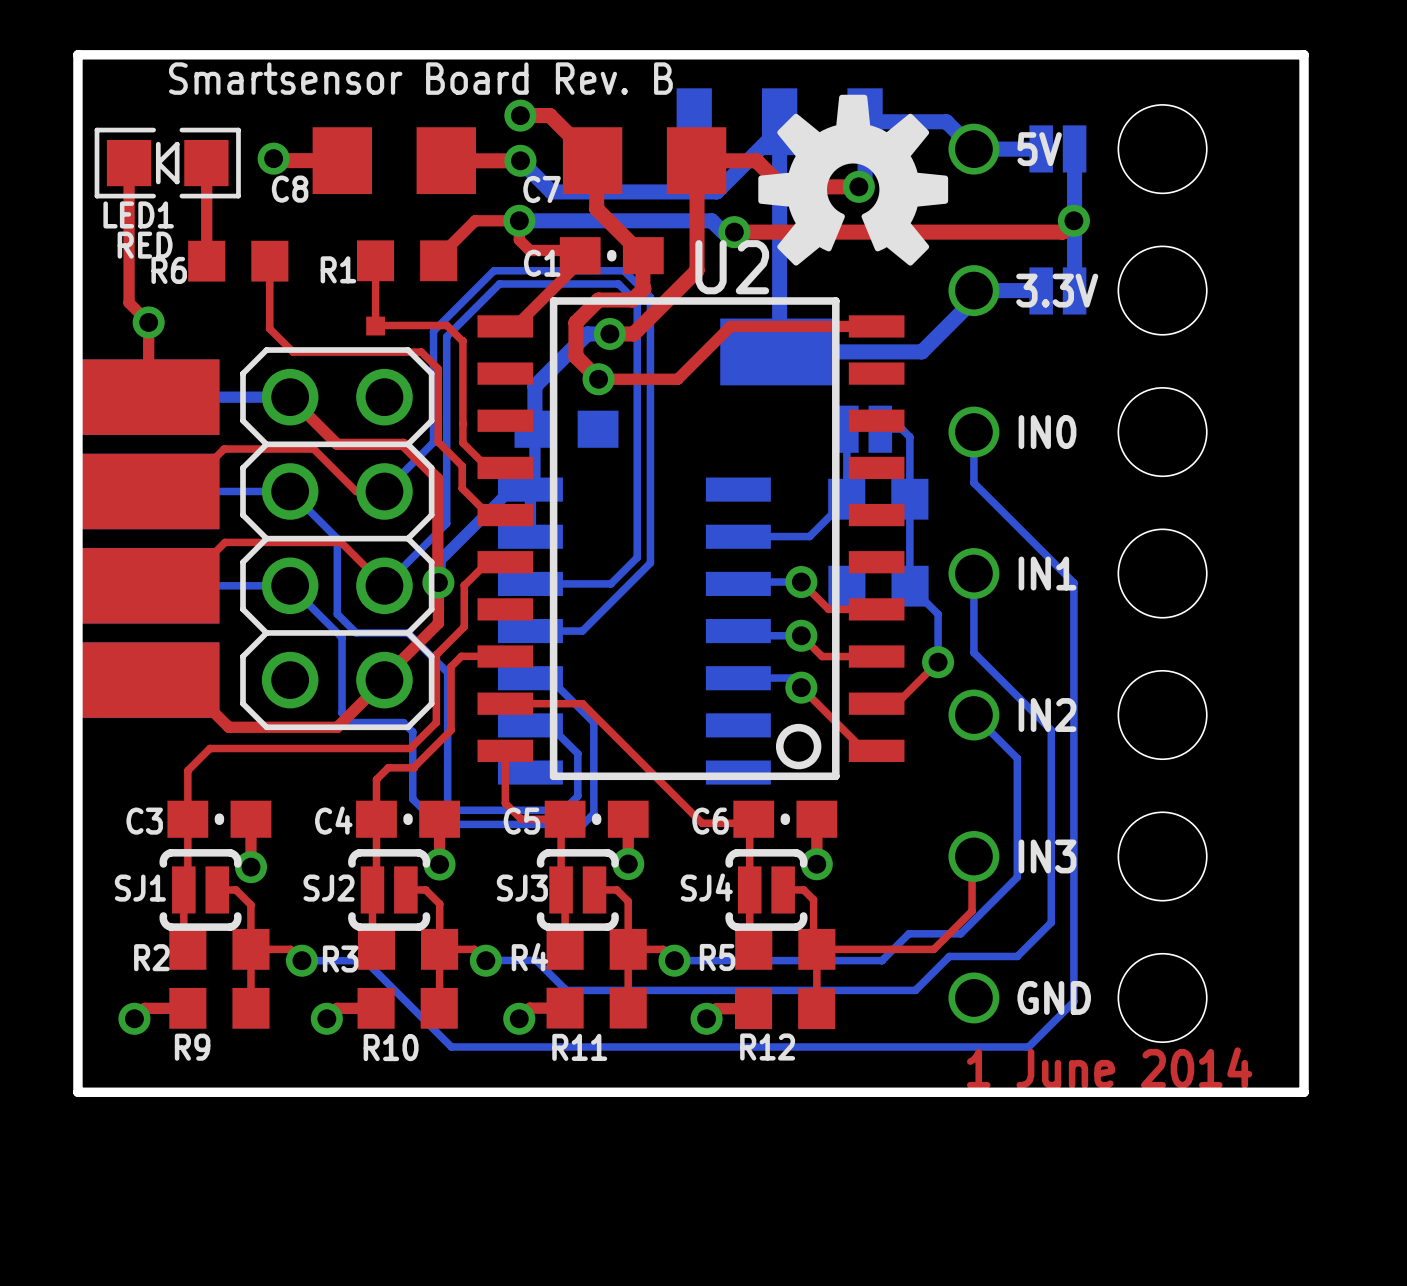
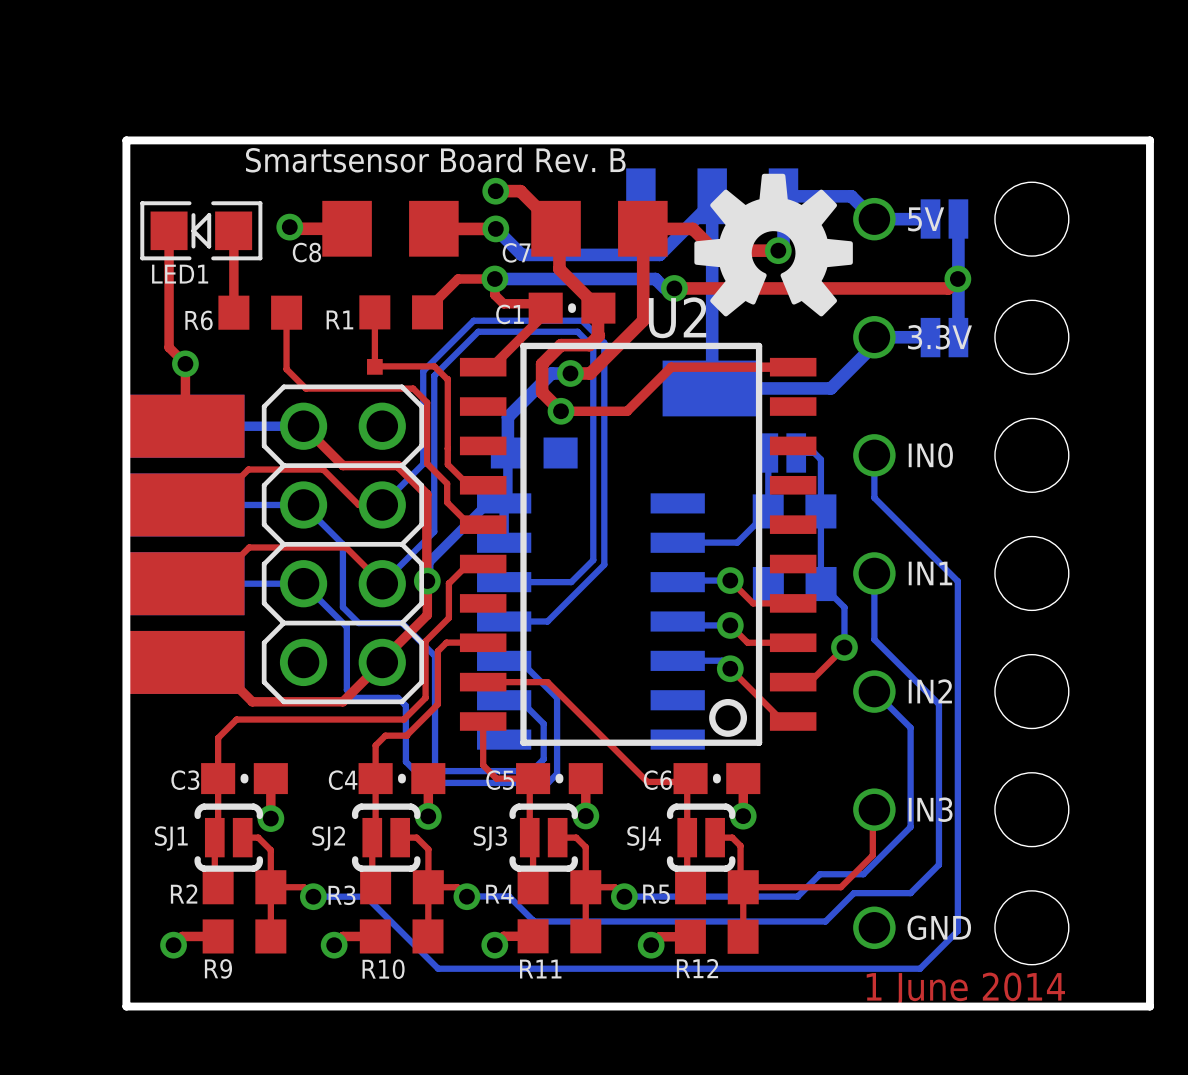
LED1 value: RED (145, 245) -> none

